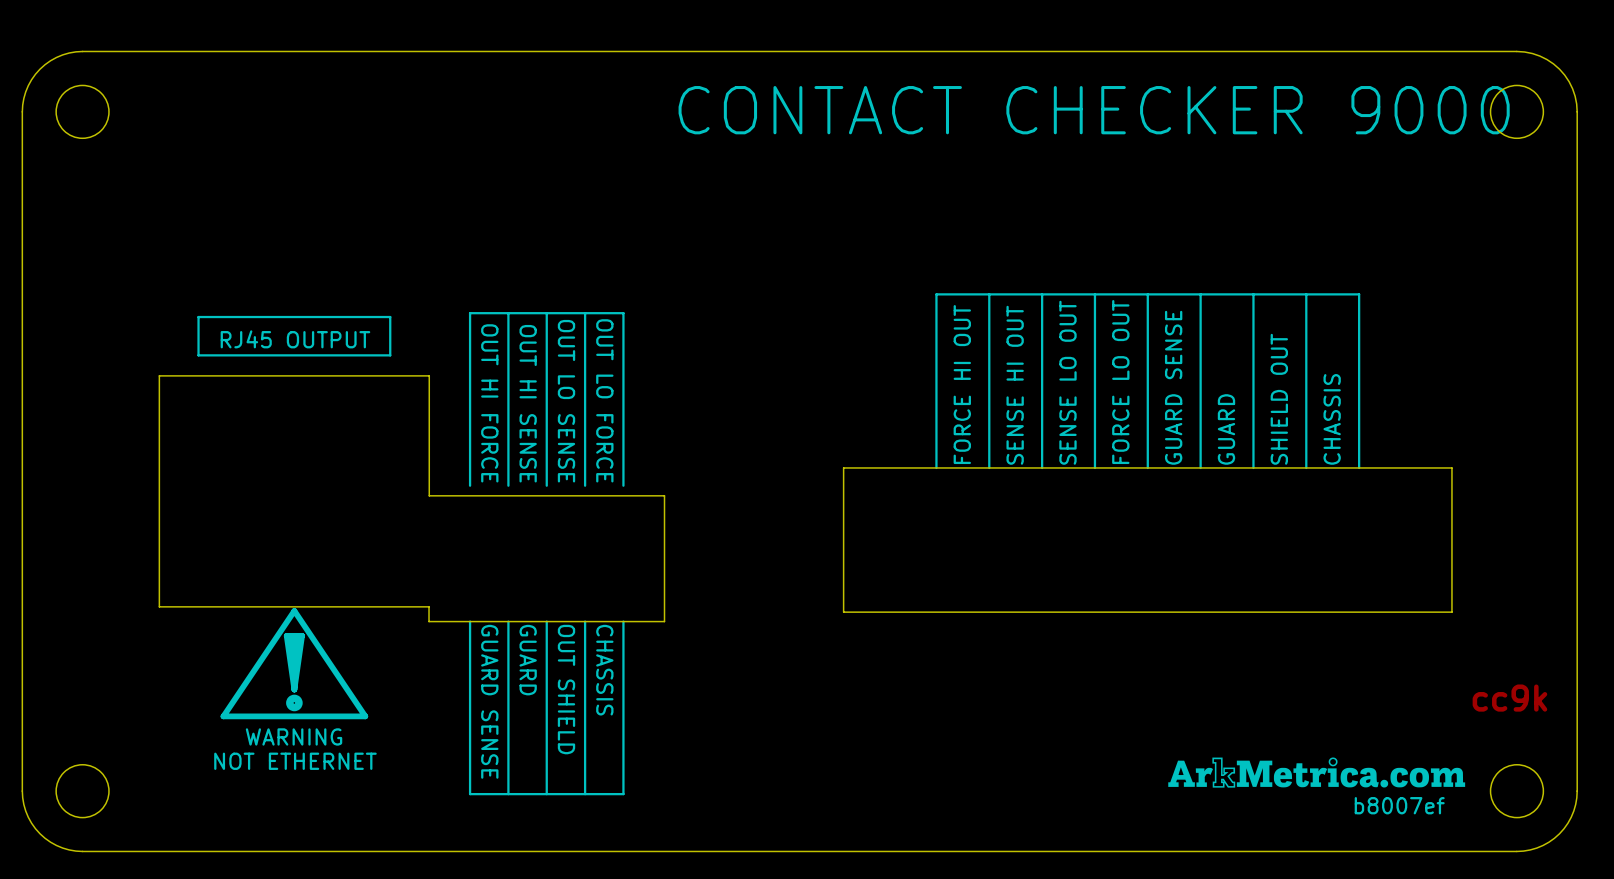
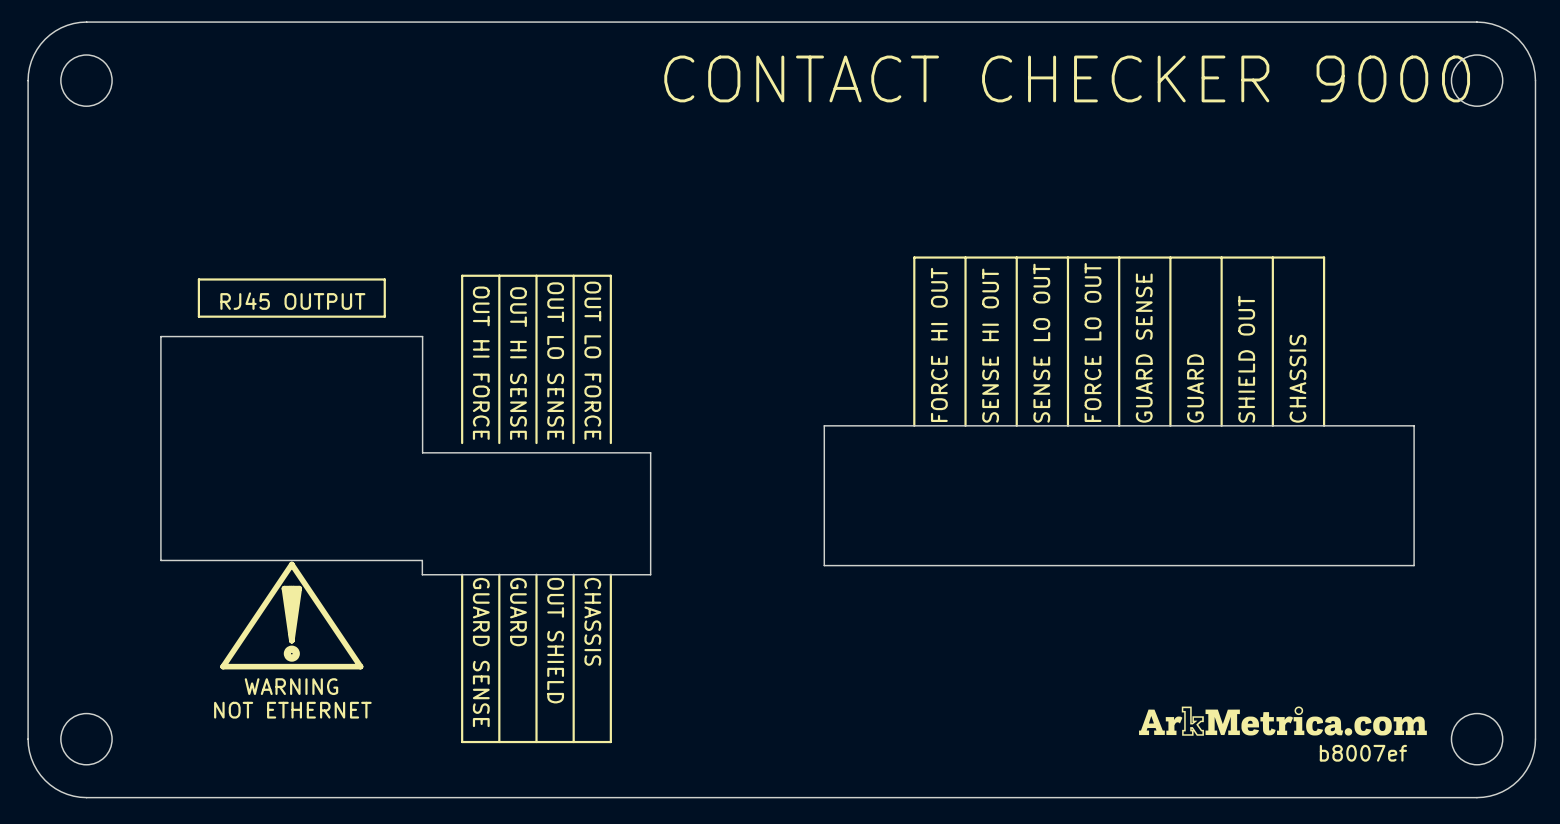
text: cc9k (1509, 698) -> none

